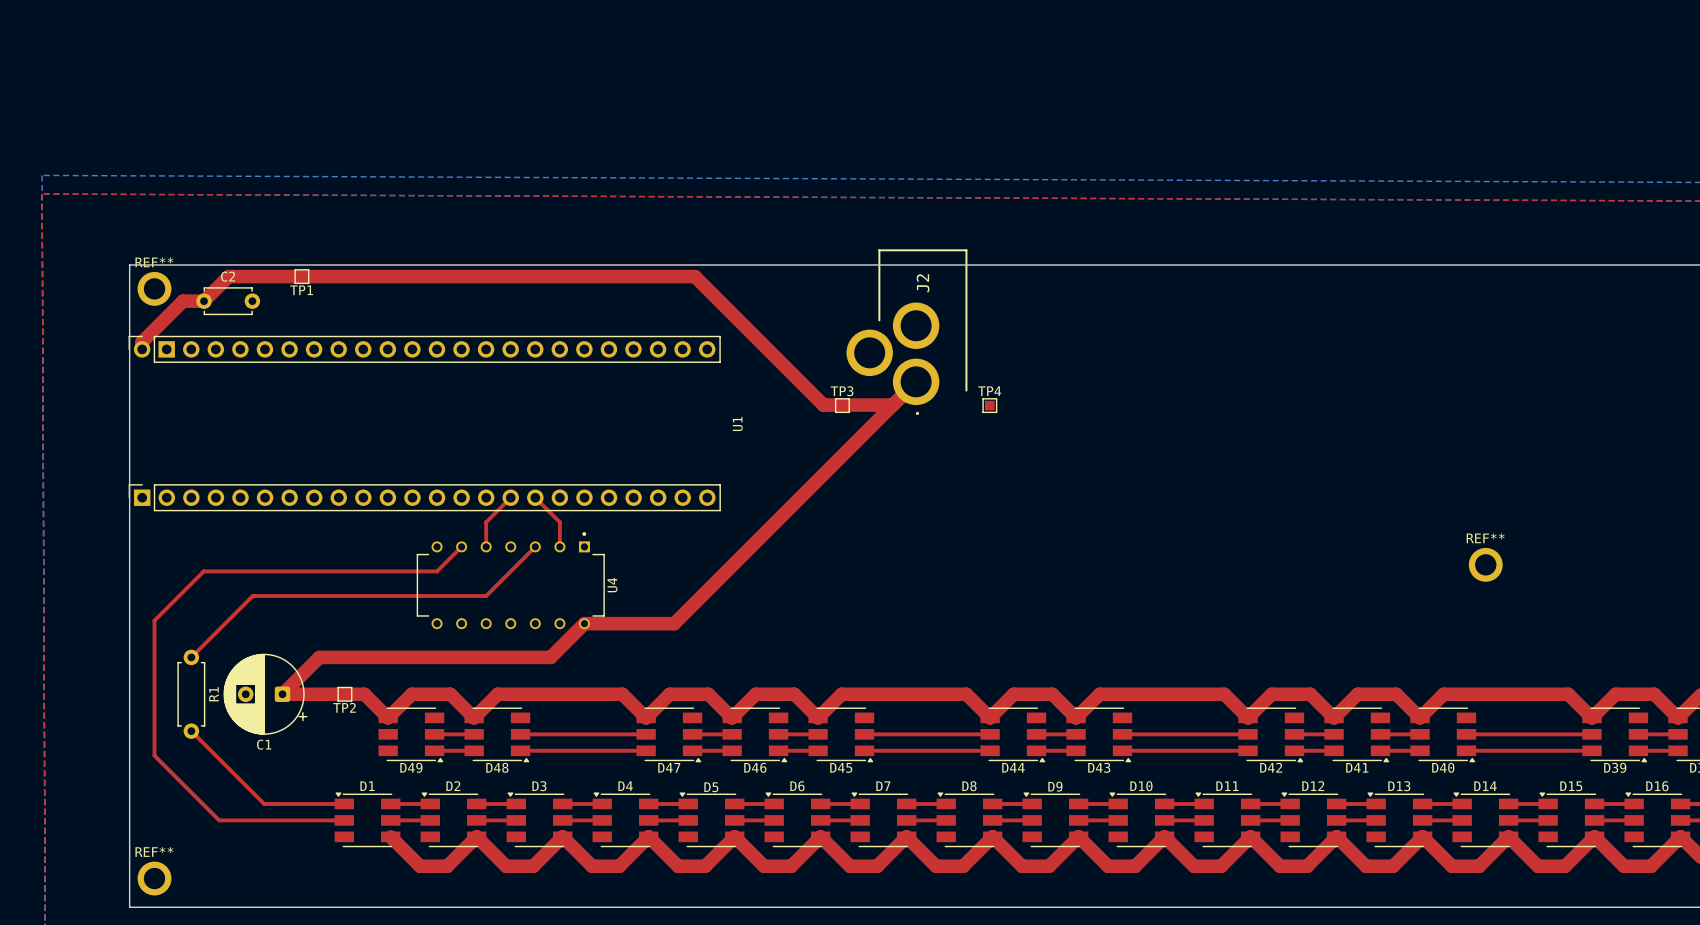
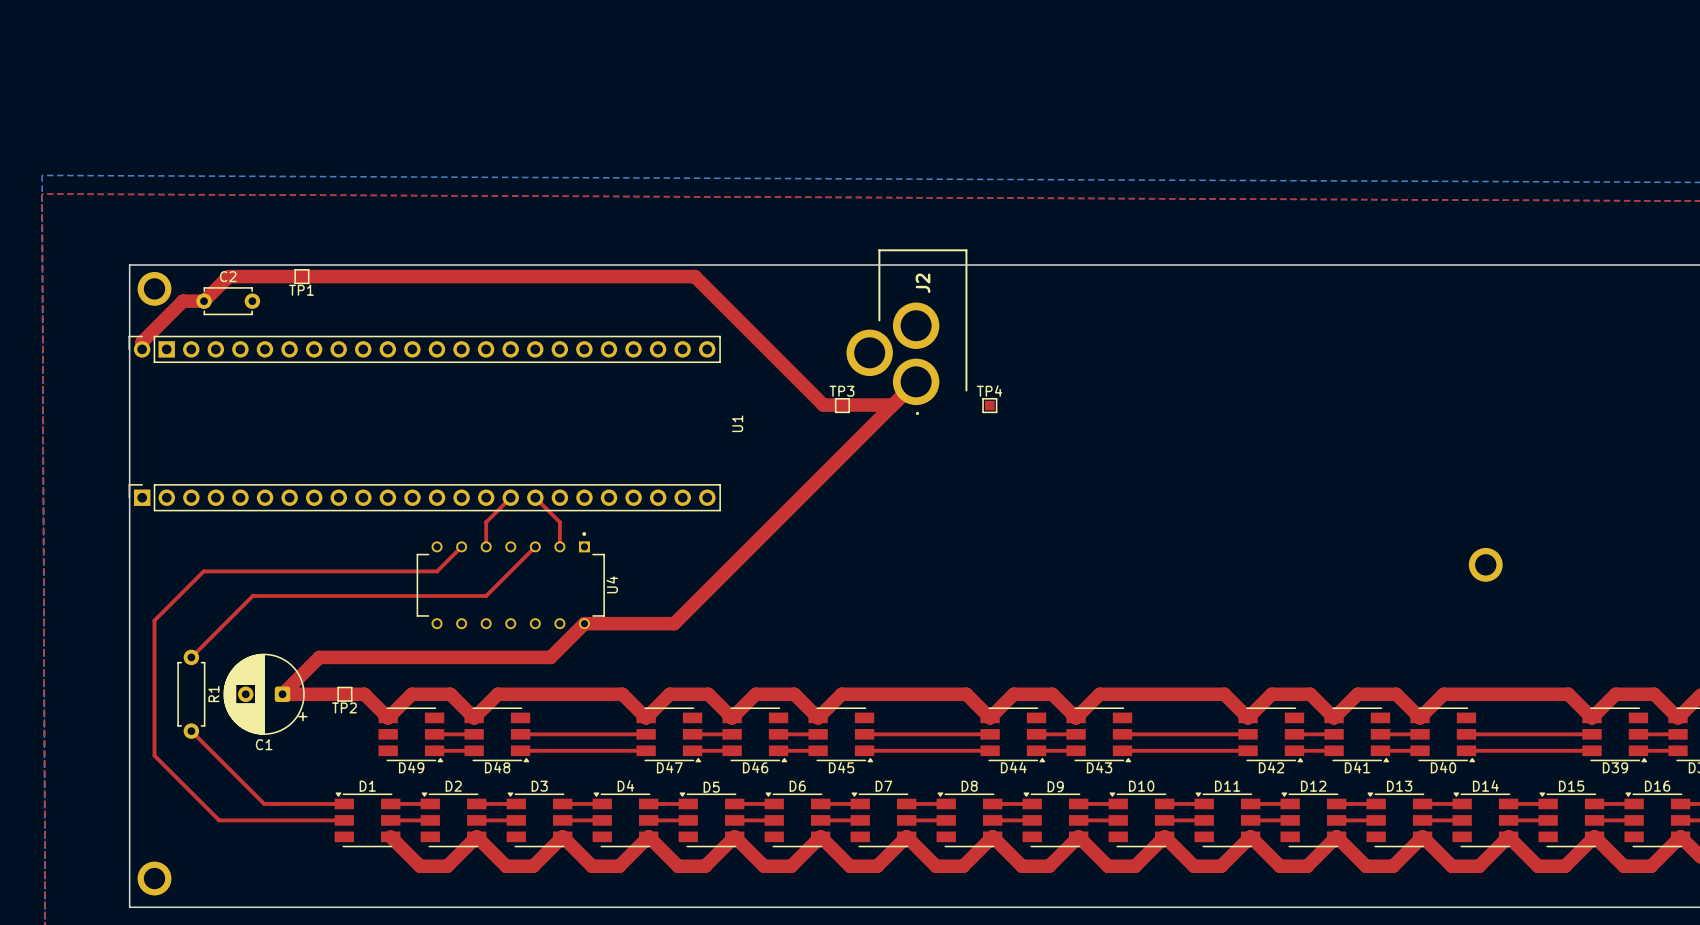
REF** name: REF** (154, 262) -> none
REF** name: REF** (1485, 538) -> none
REF** name: REF** (154, 851) -> none

